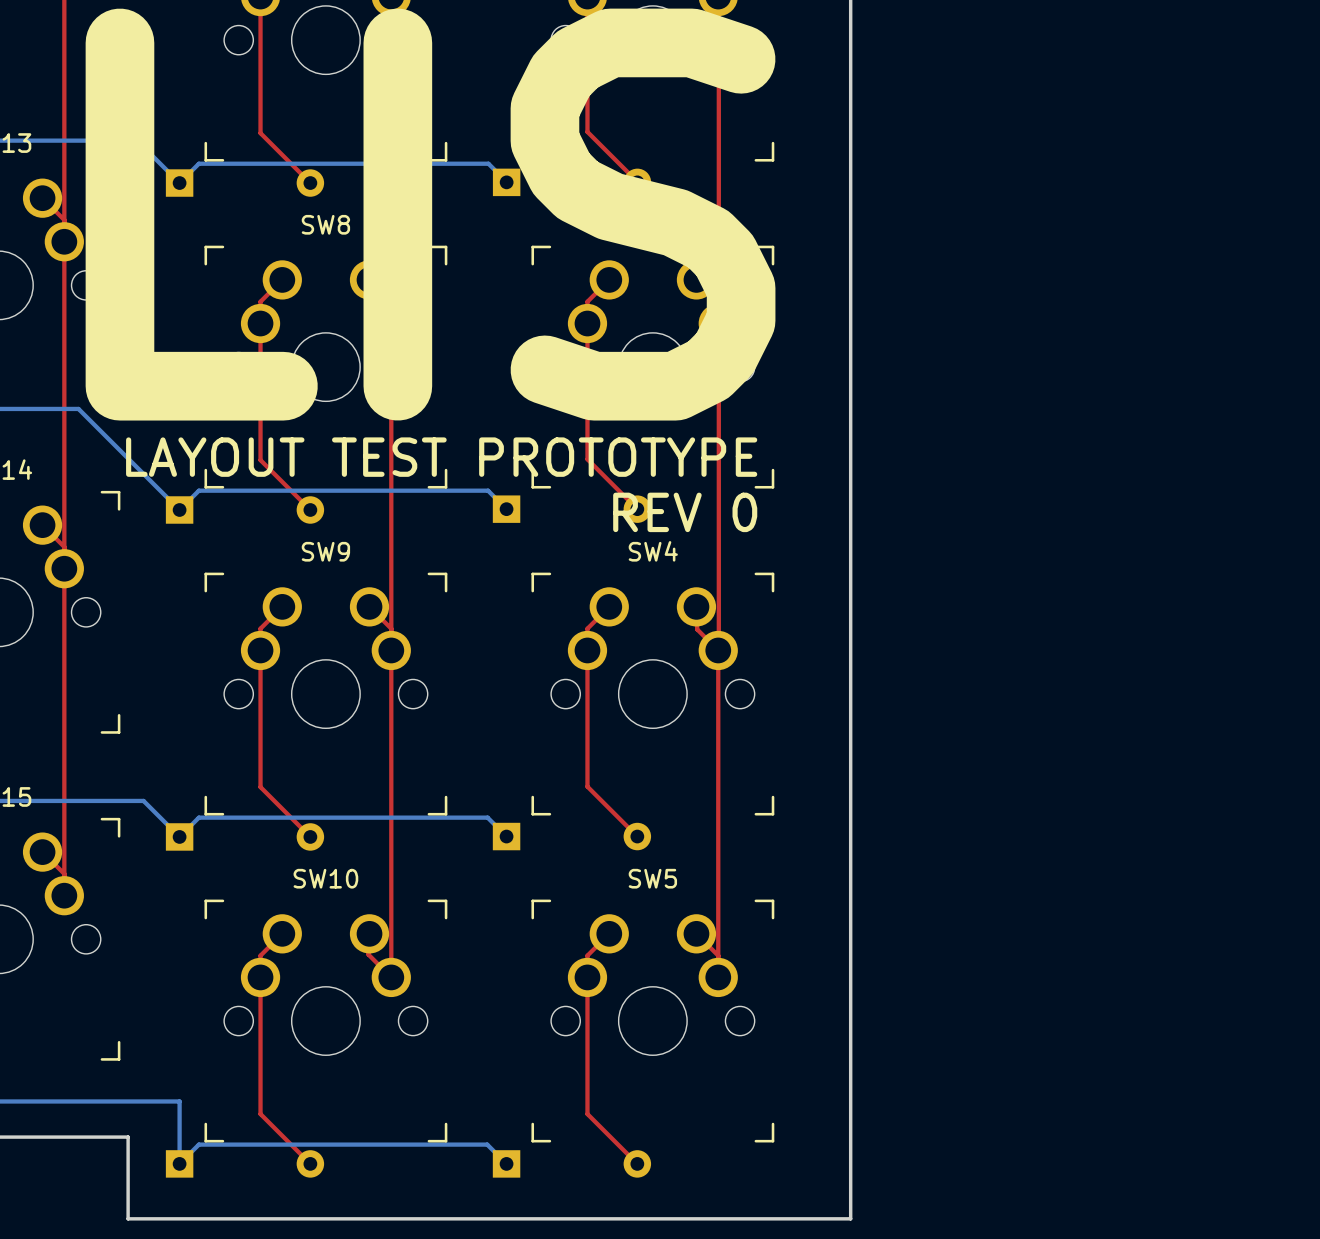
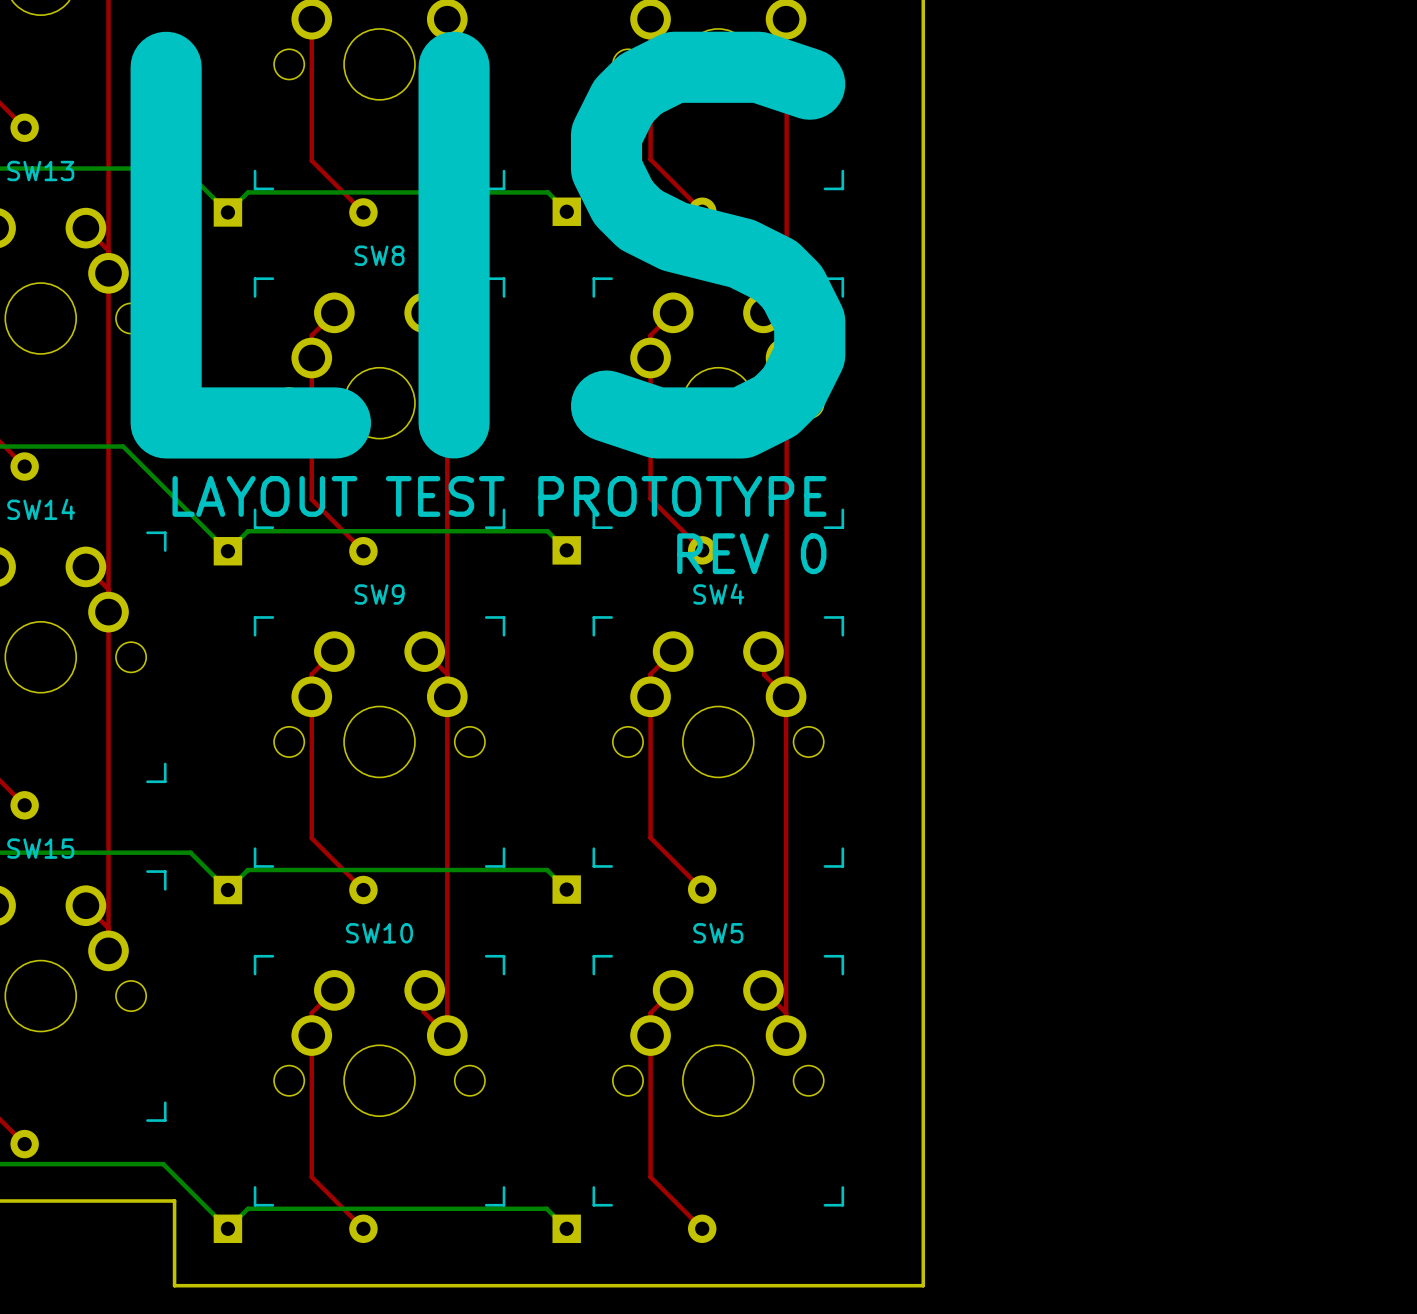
bottom track: (117, 1101) (179, 1101) (179, 1163) -> (163, 1164) (227, 1228)

